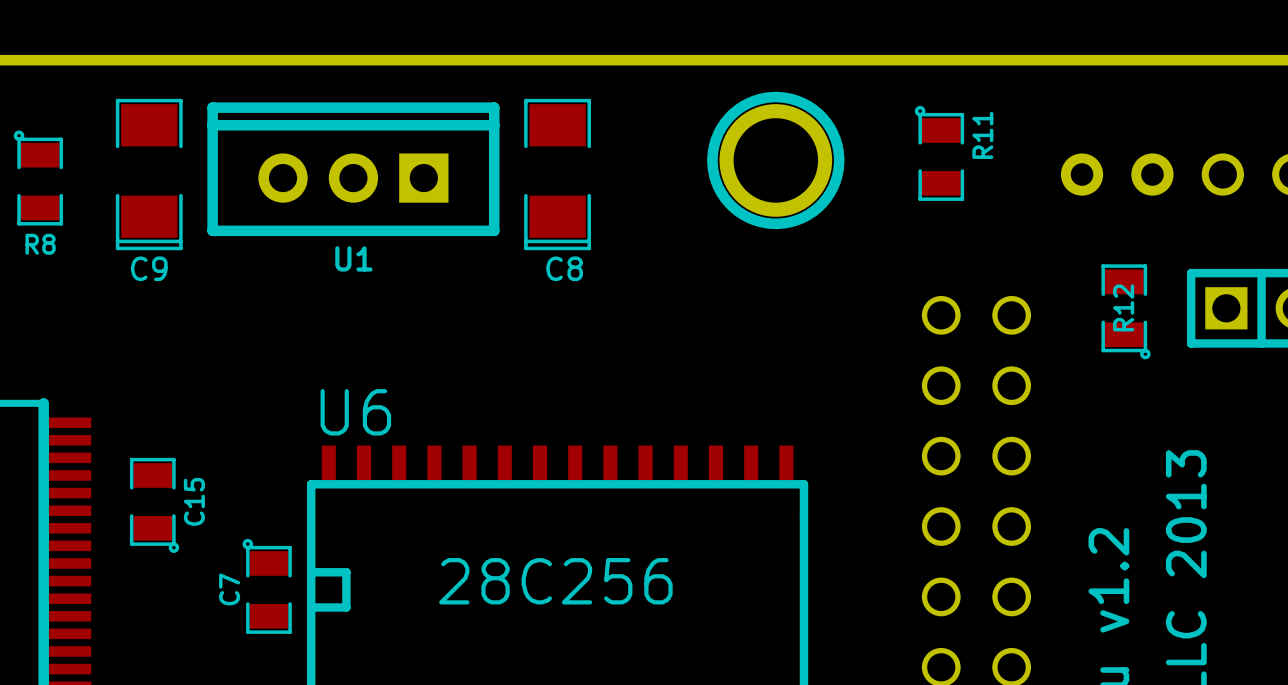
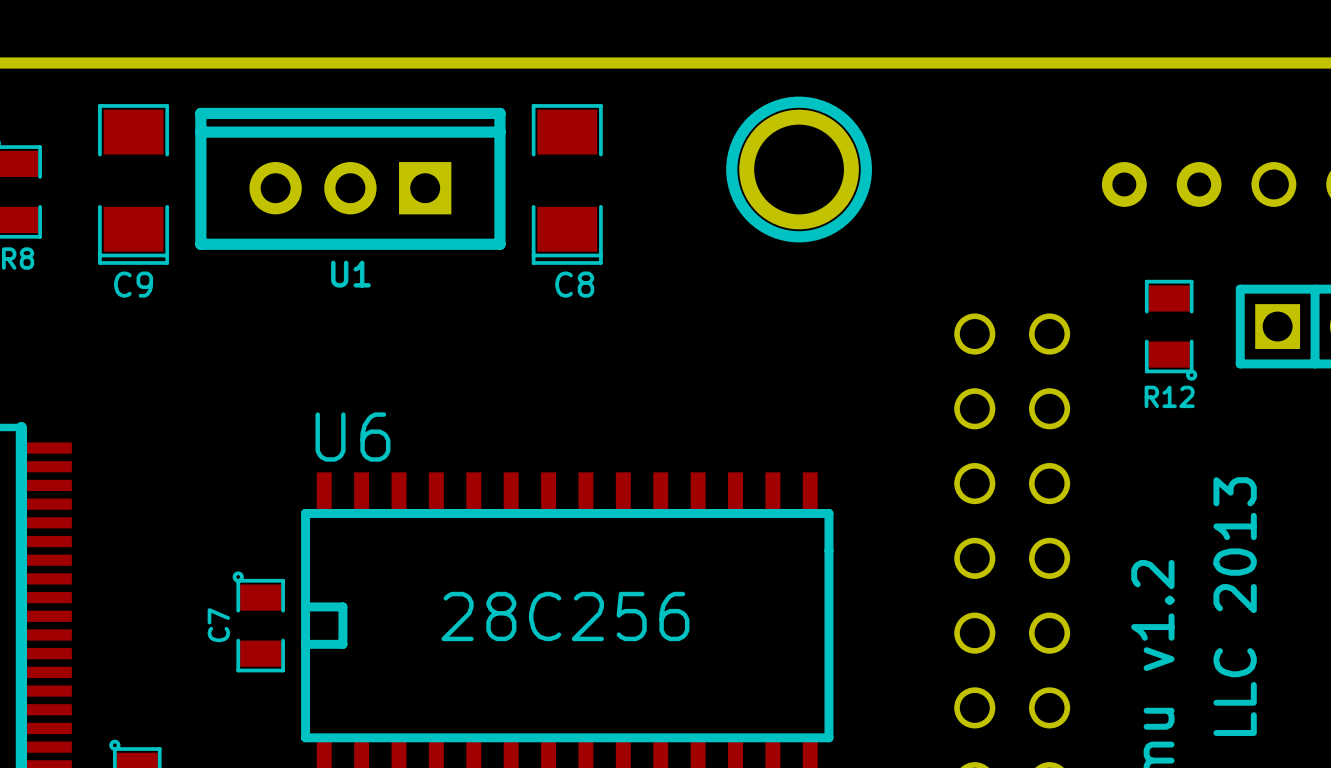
R11: (939, 153) -> none
R12 name rotation: 0° (1123, 307) -> 90° clockwise (1169, 396)
R12 name position: R12 (1123, 307) -> R12 (1169, 396)
C15: (154, 505) -> none

